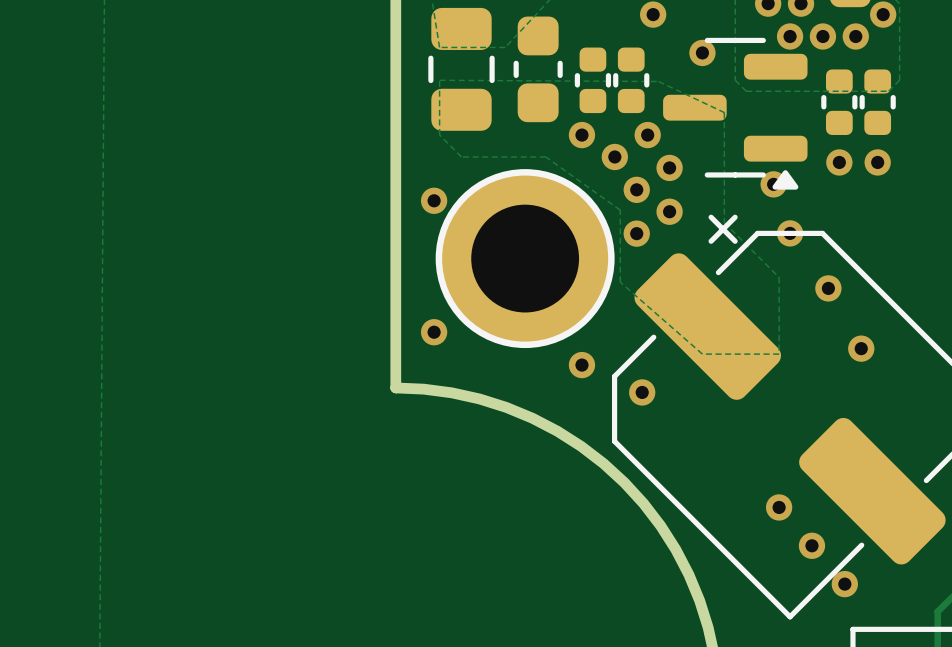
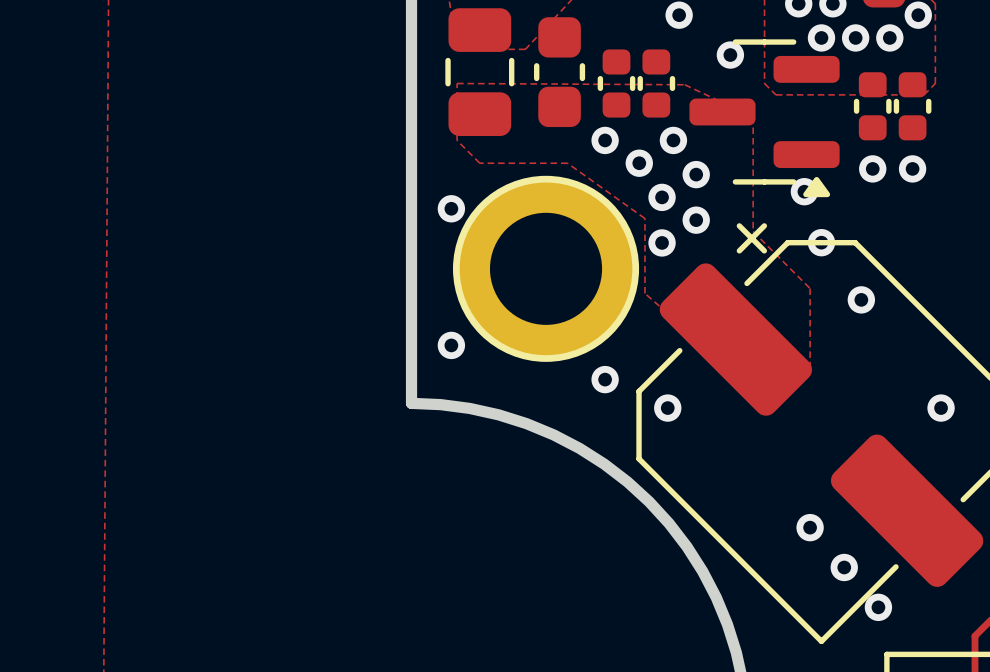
via position: (861, 348) -> (941, 408)

